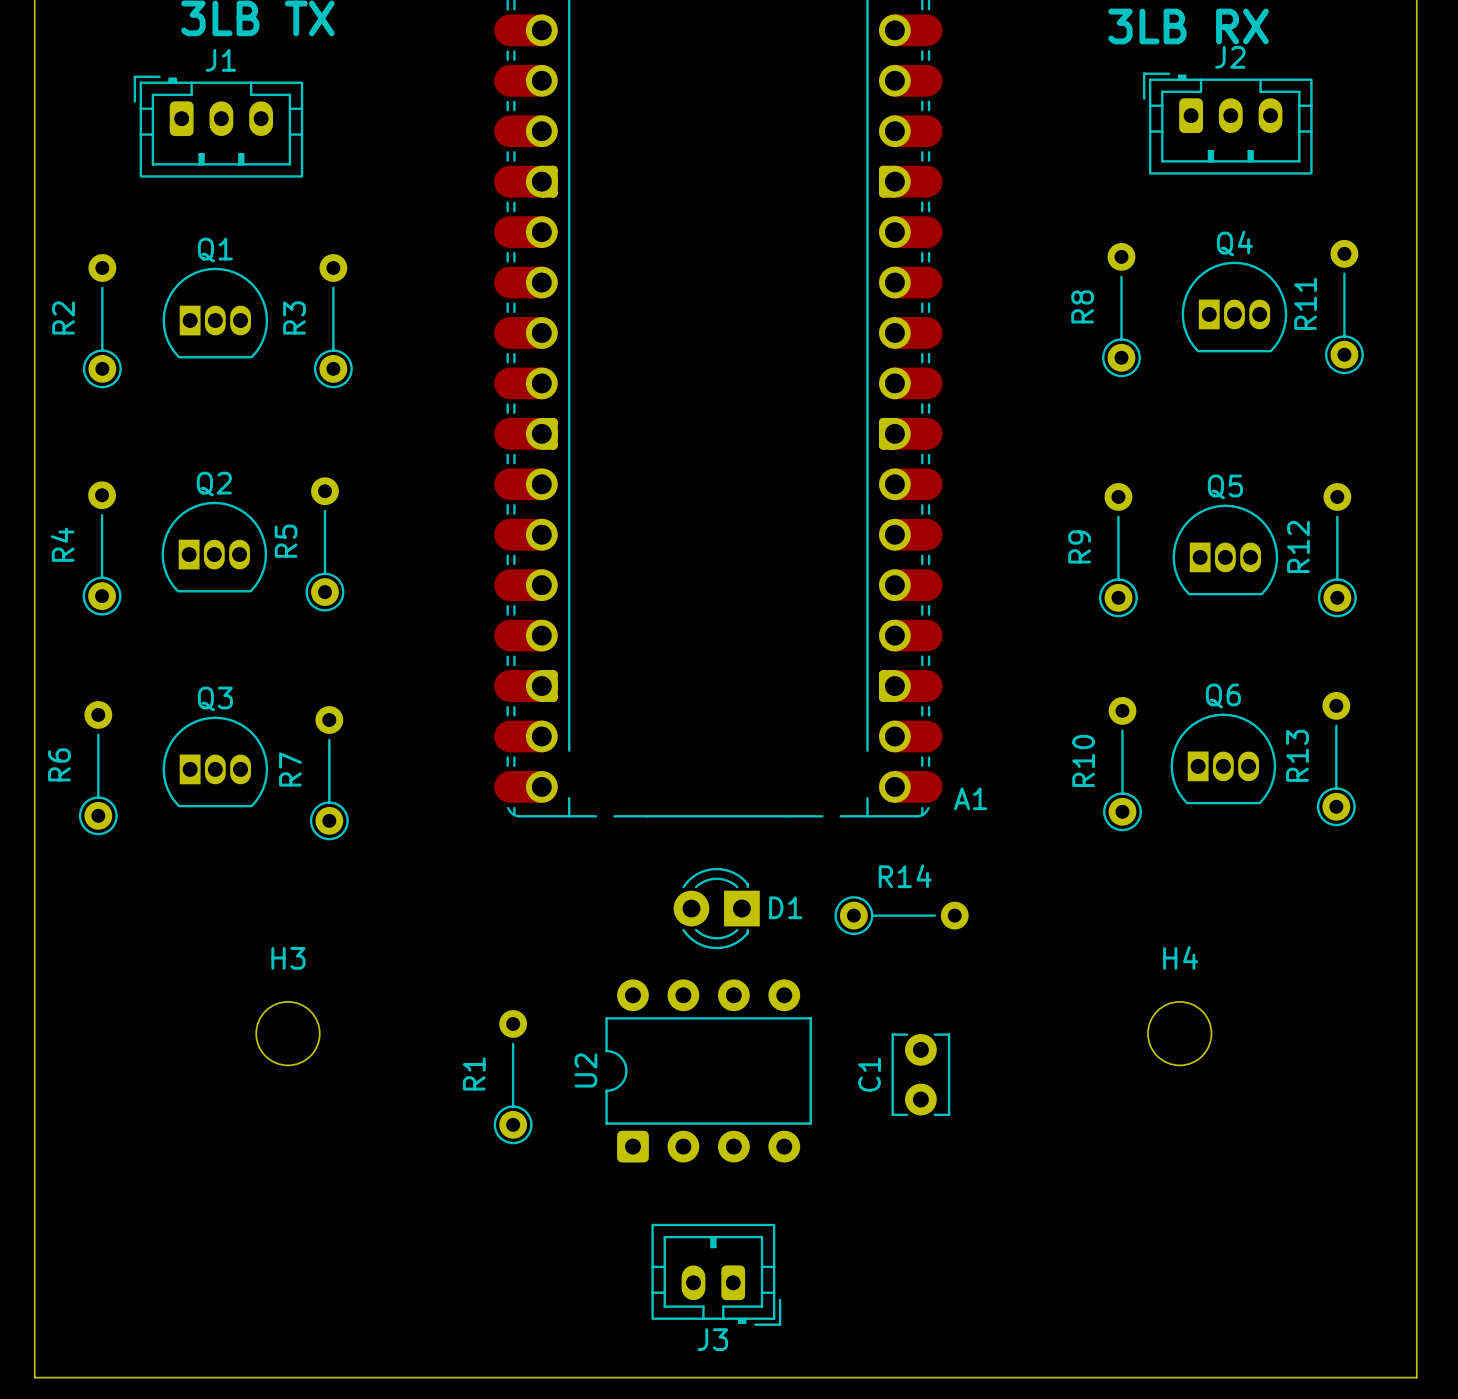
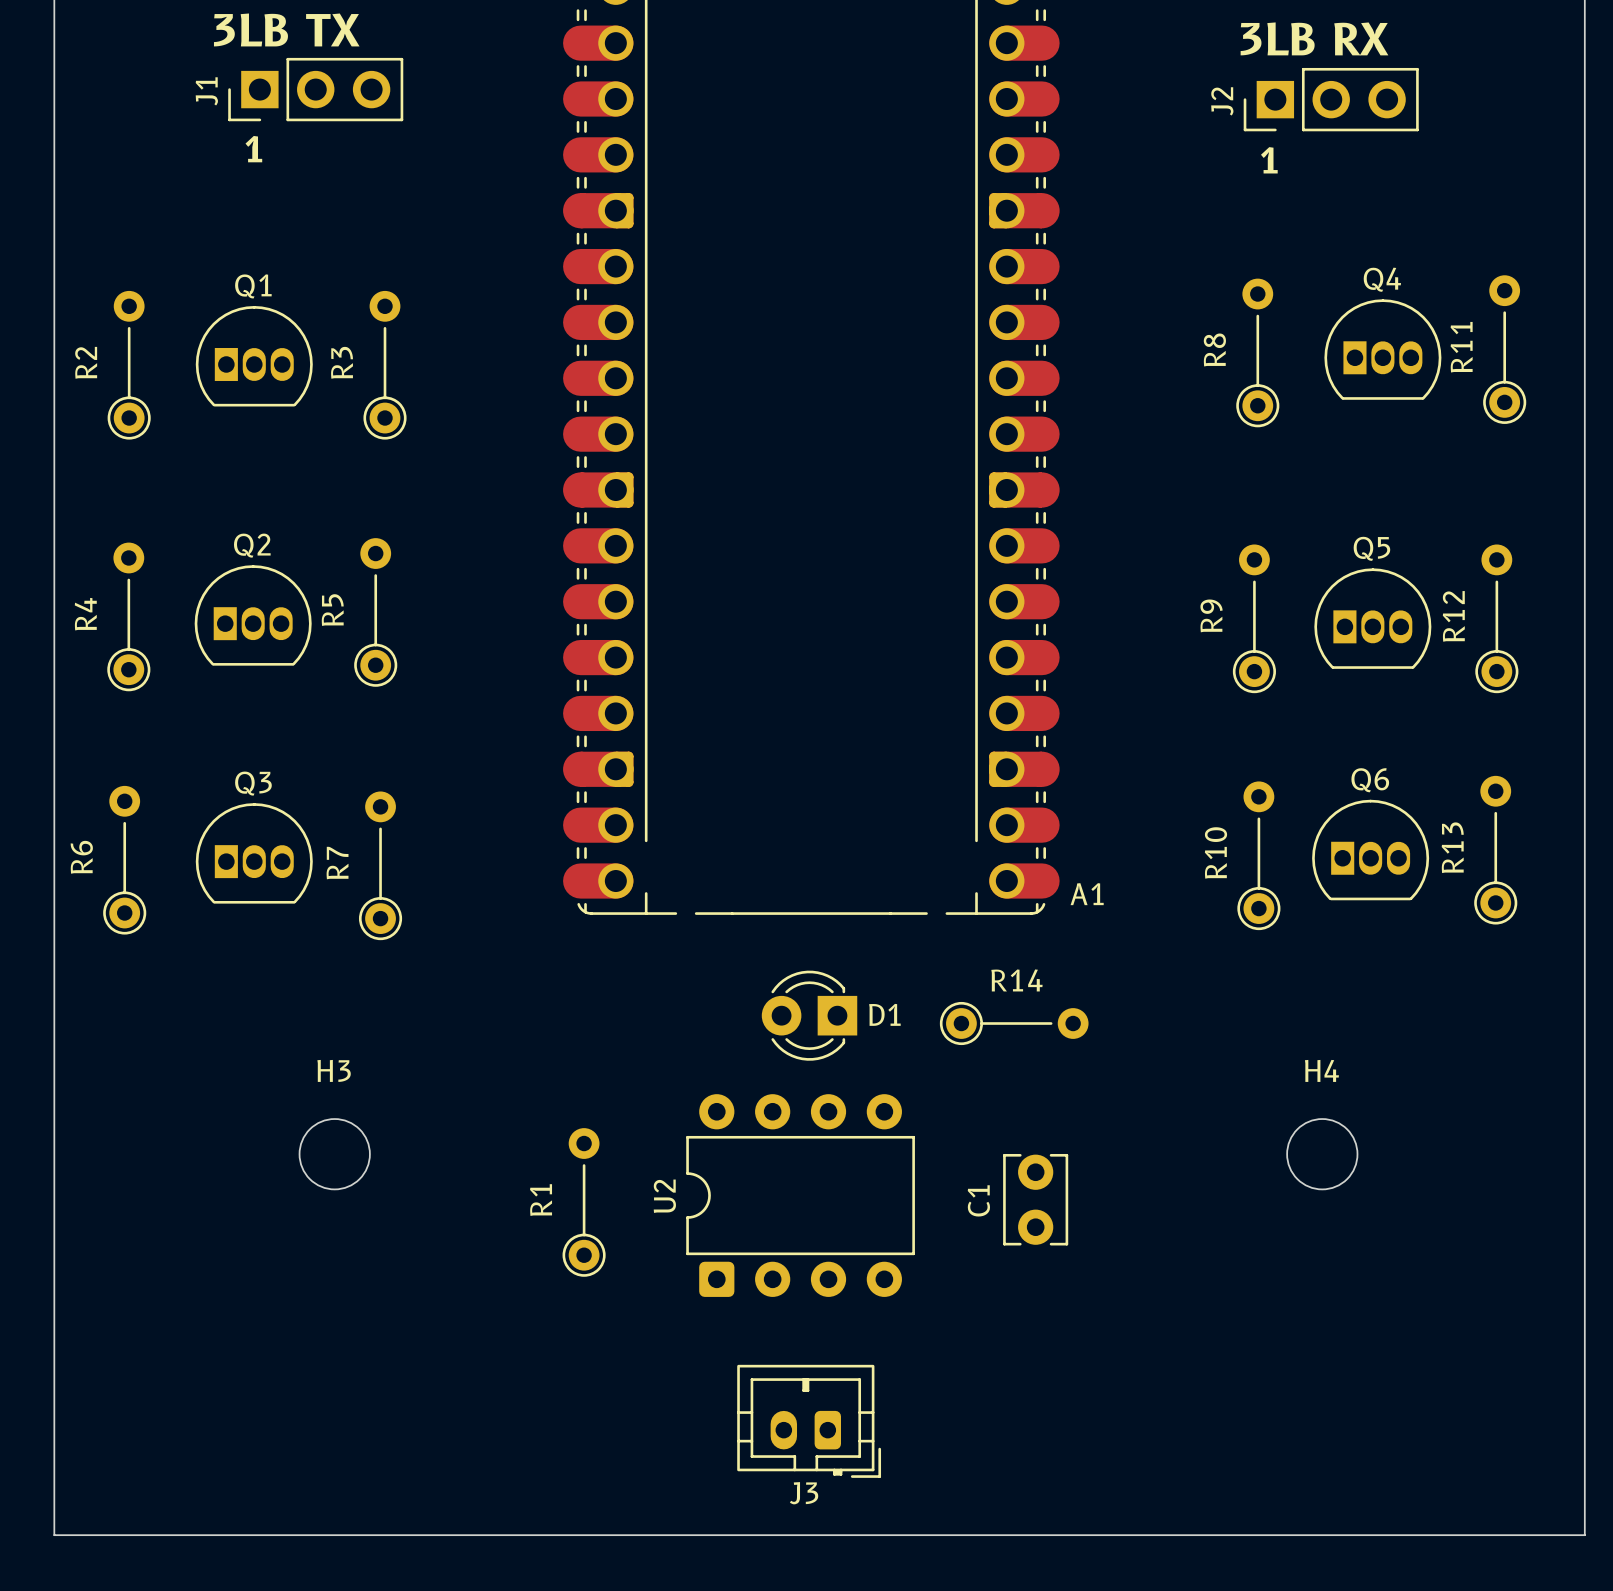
J2 name position: J2 (1230, 57) -> J2 (1222, 101)
J1 name position: J1 (220, 60) -> J1 (206, 91)
J2 footprint: [1143, 72, 1313, 175] -> [1243, 67, 1419, 132]
J1 footprint: [133, 75, 304, 178] -> [228, 57, 404, 122]
text: none -> 1 (253, 149)
text: none -> 1 (1269, 160)

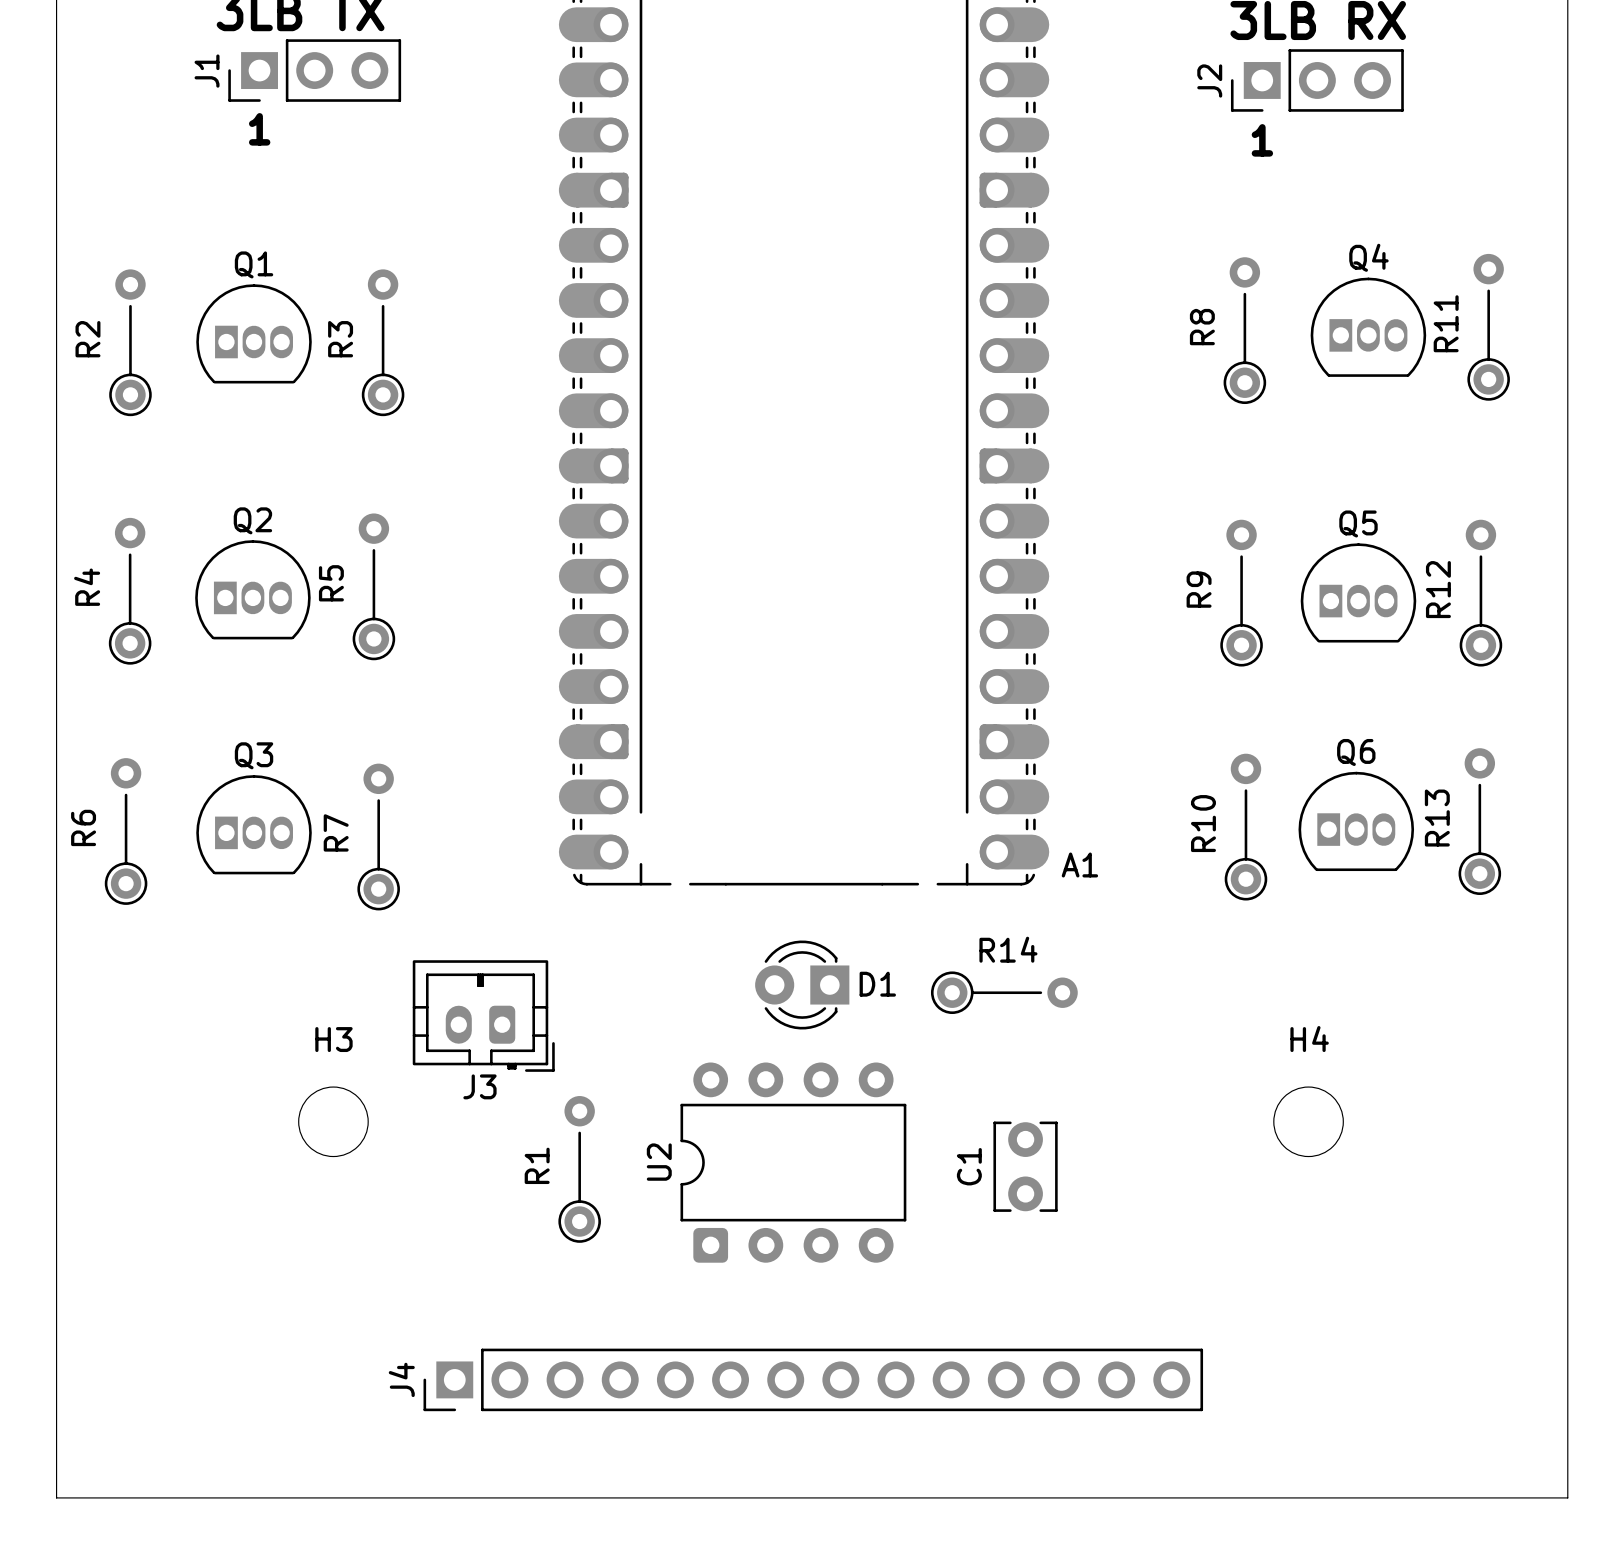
J4: none -> (813, 1379)
J3 position: (809, 1421) -> (483, 1016)

